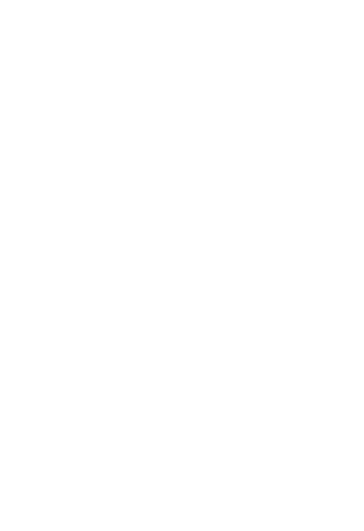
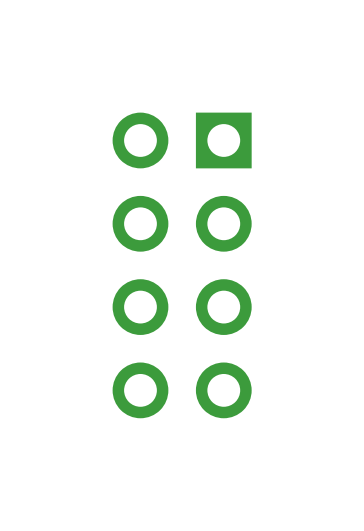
part: none -> (182, 265)

